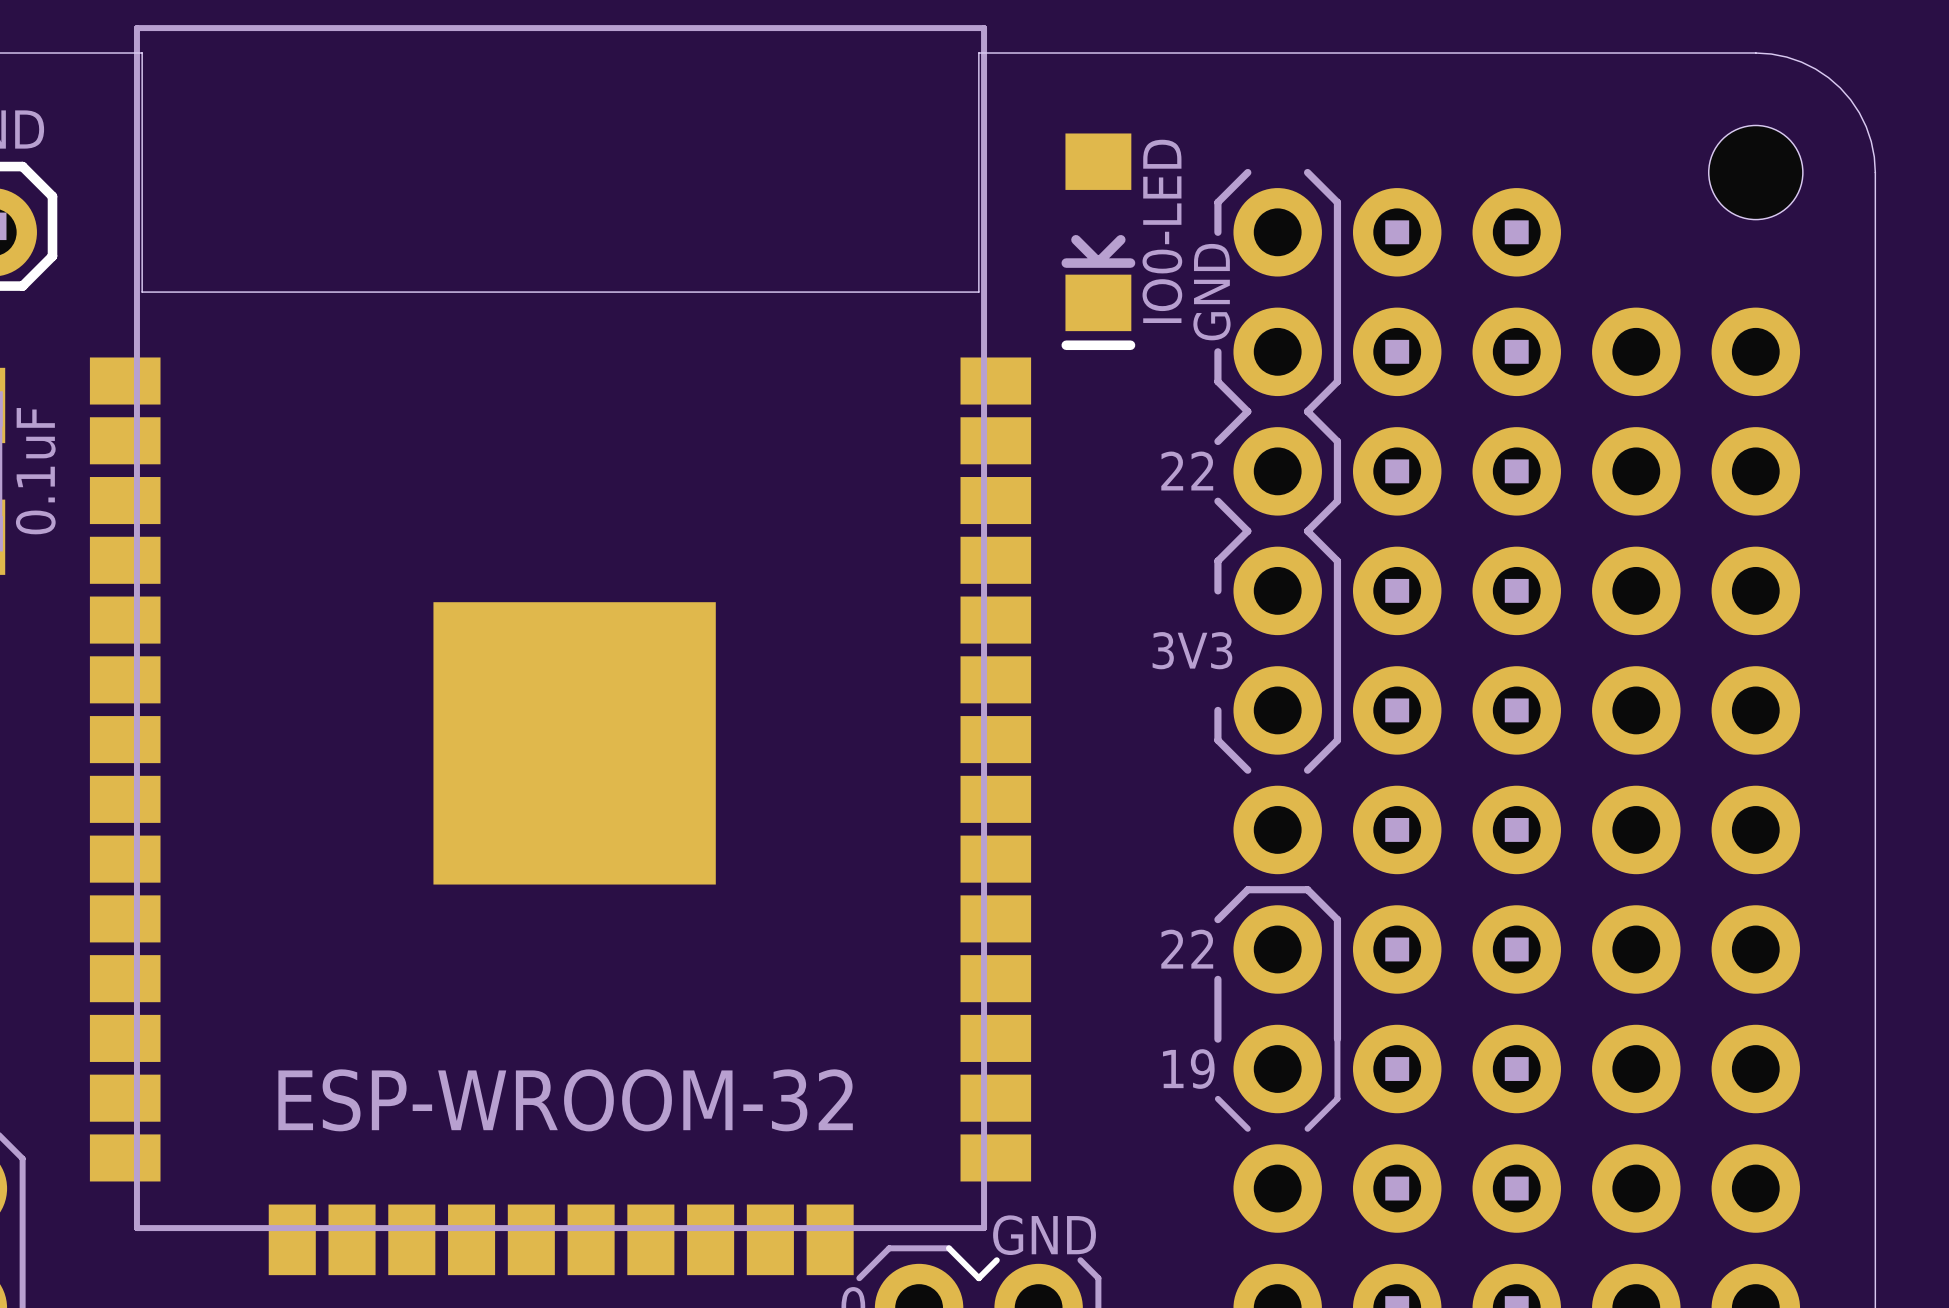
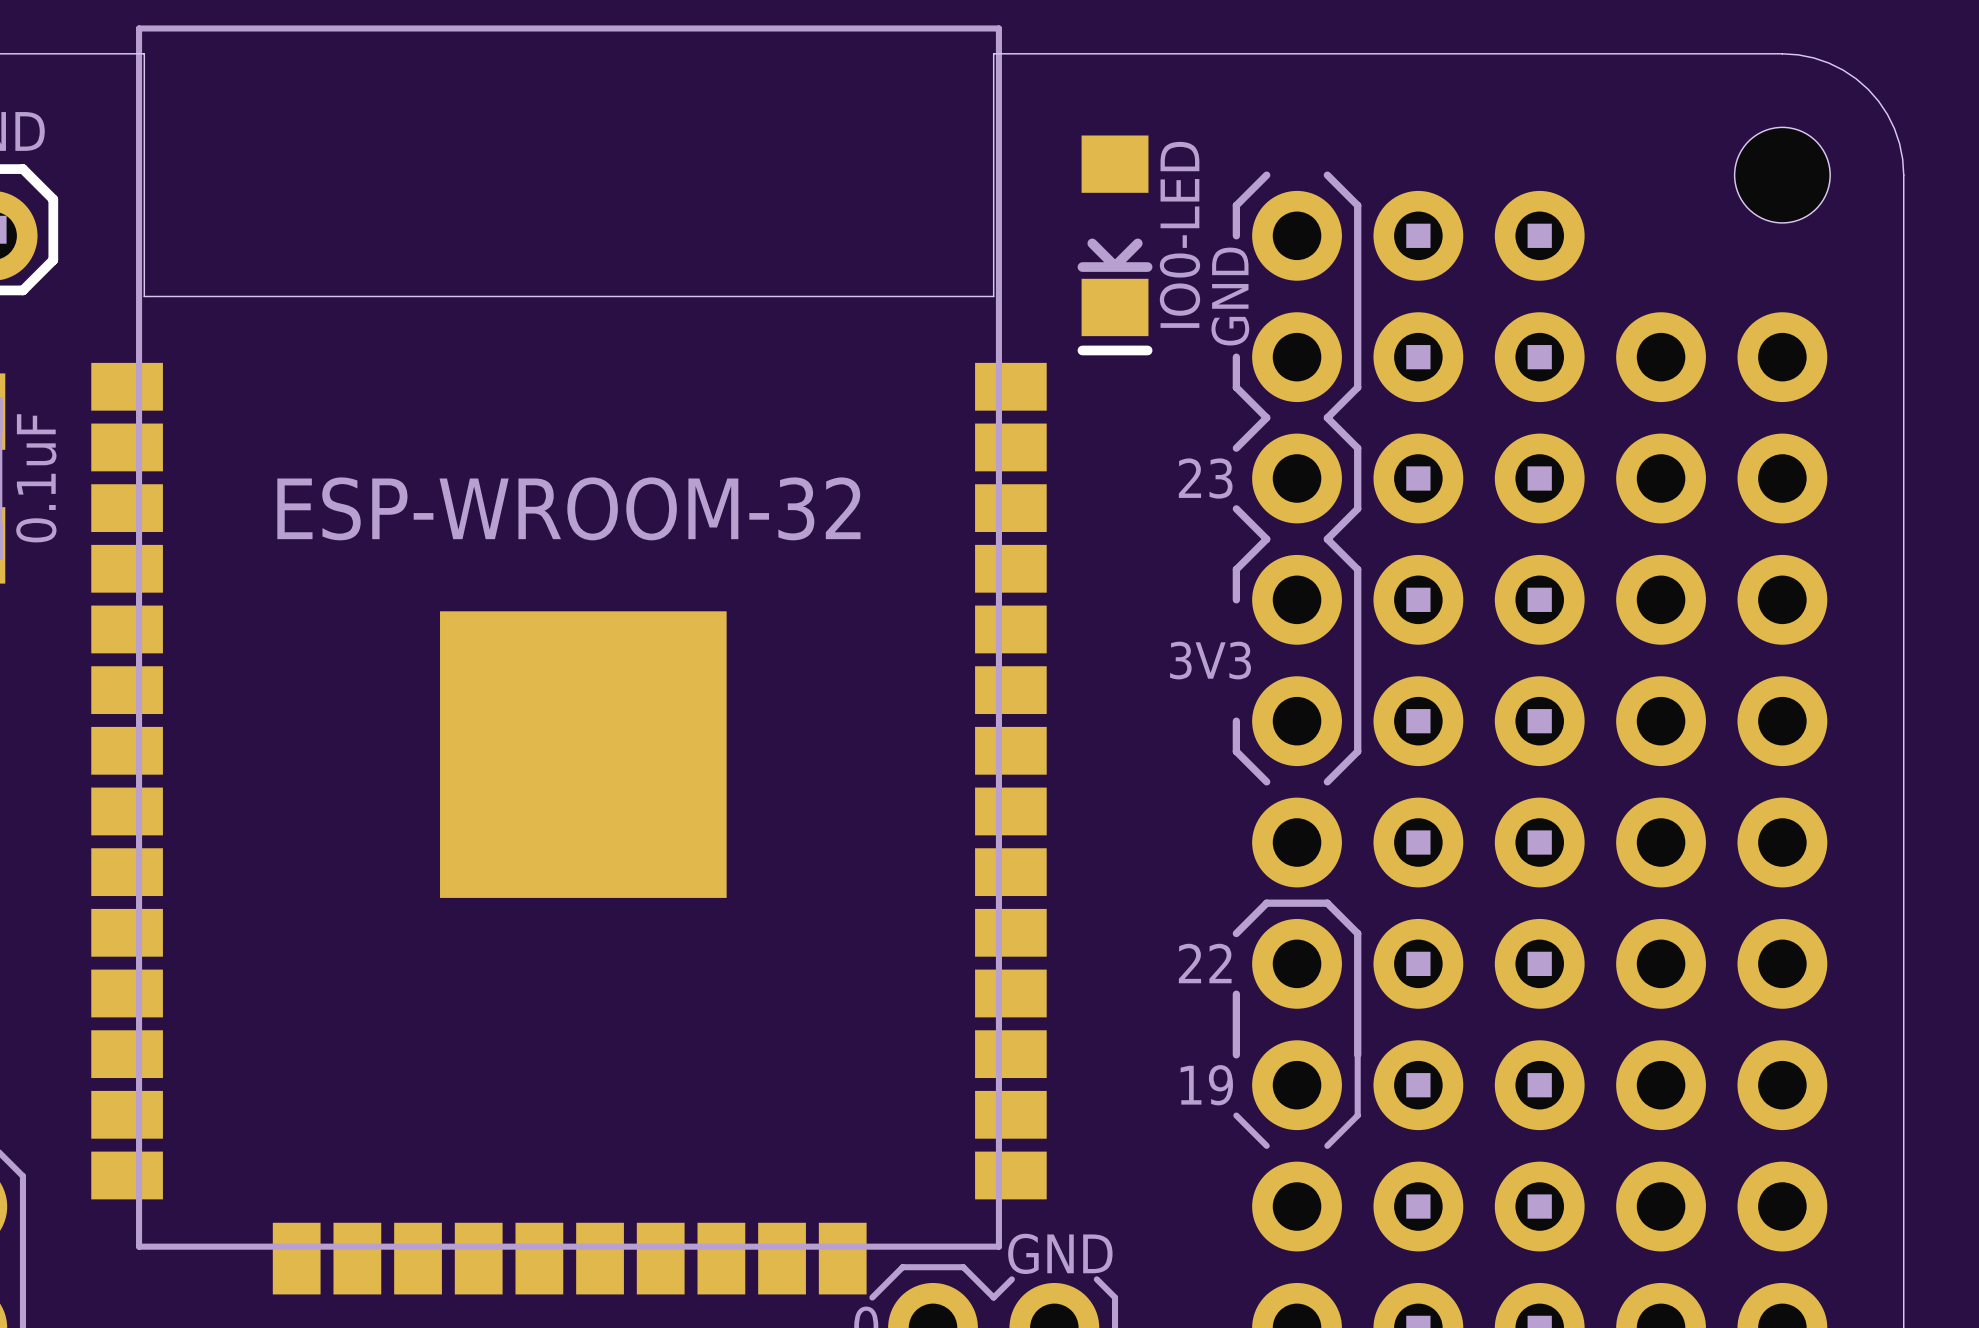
text: 22 (1187, 471) -> 23 (1205, 478)
part value position: ESP-WROOM-32 (565, 1100) -> ESP-WROOM-32 (568, 508)
line: (948, 1248) (978, 1278) (996, 1260) -> none
line: none -> (963, 1267) (993, 1297) (1011, 1279)

